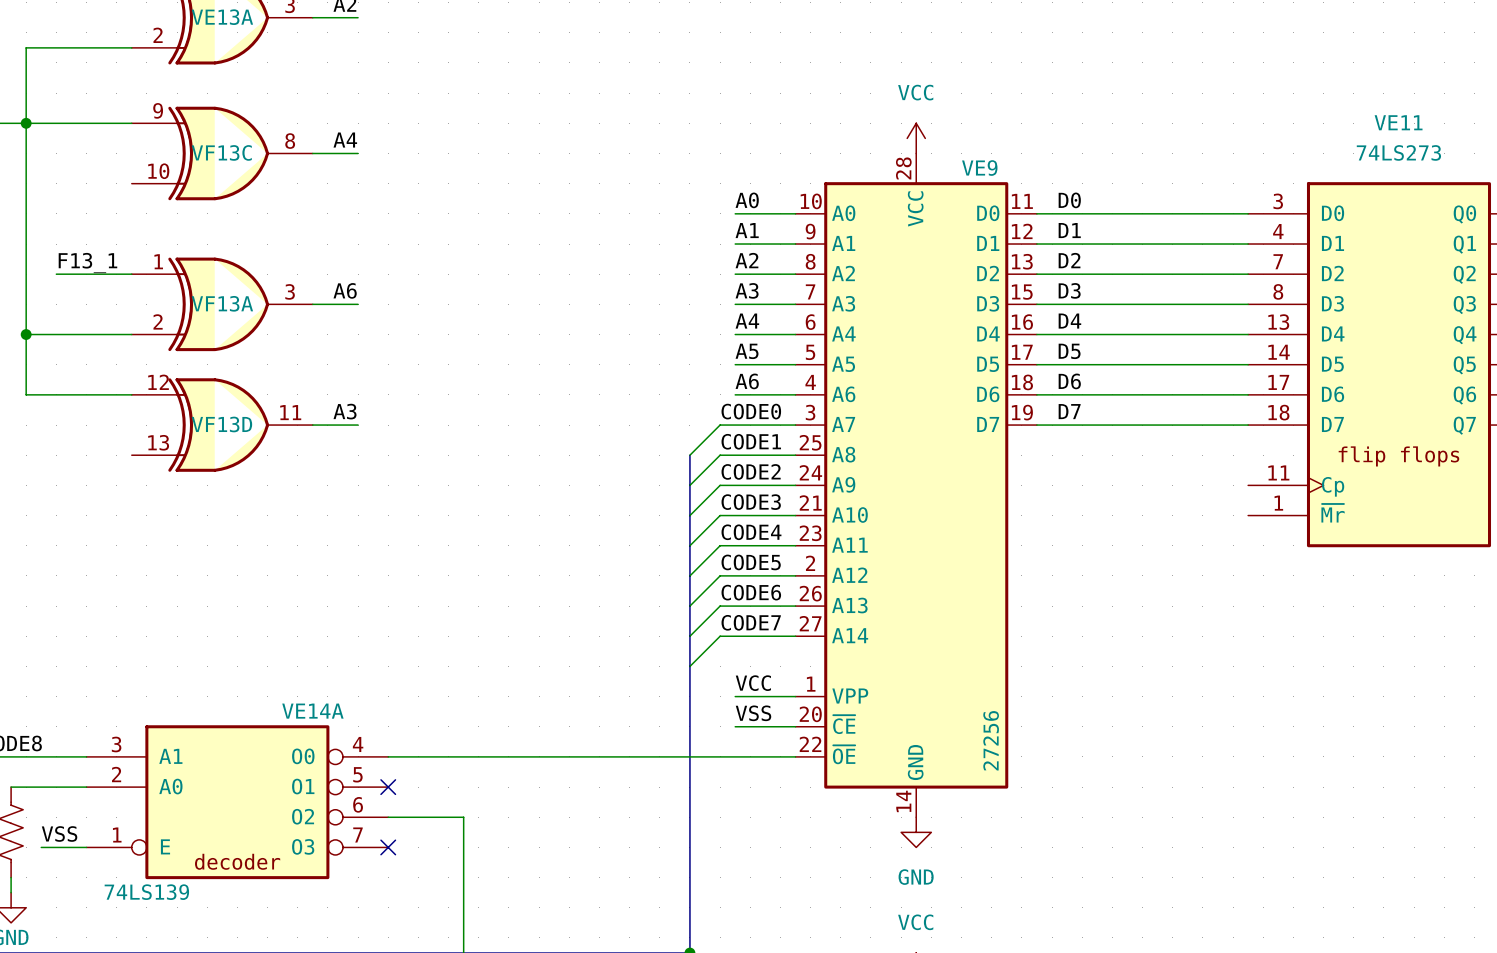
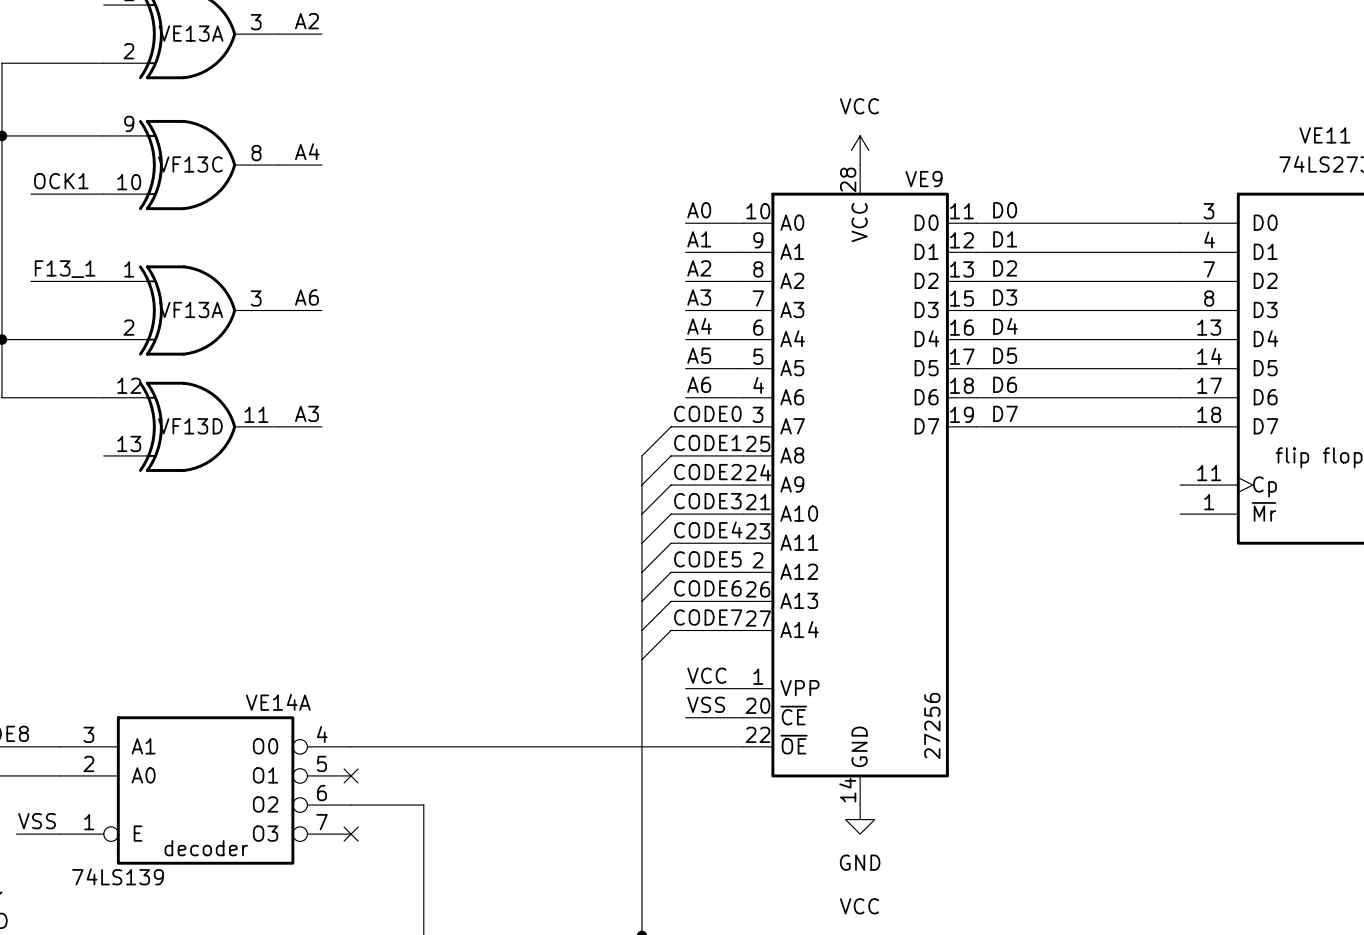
label: none -> OCK1 (61, 181)
wire: none -> (31, 194) (103, 194)

